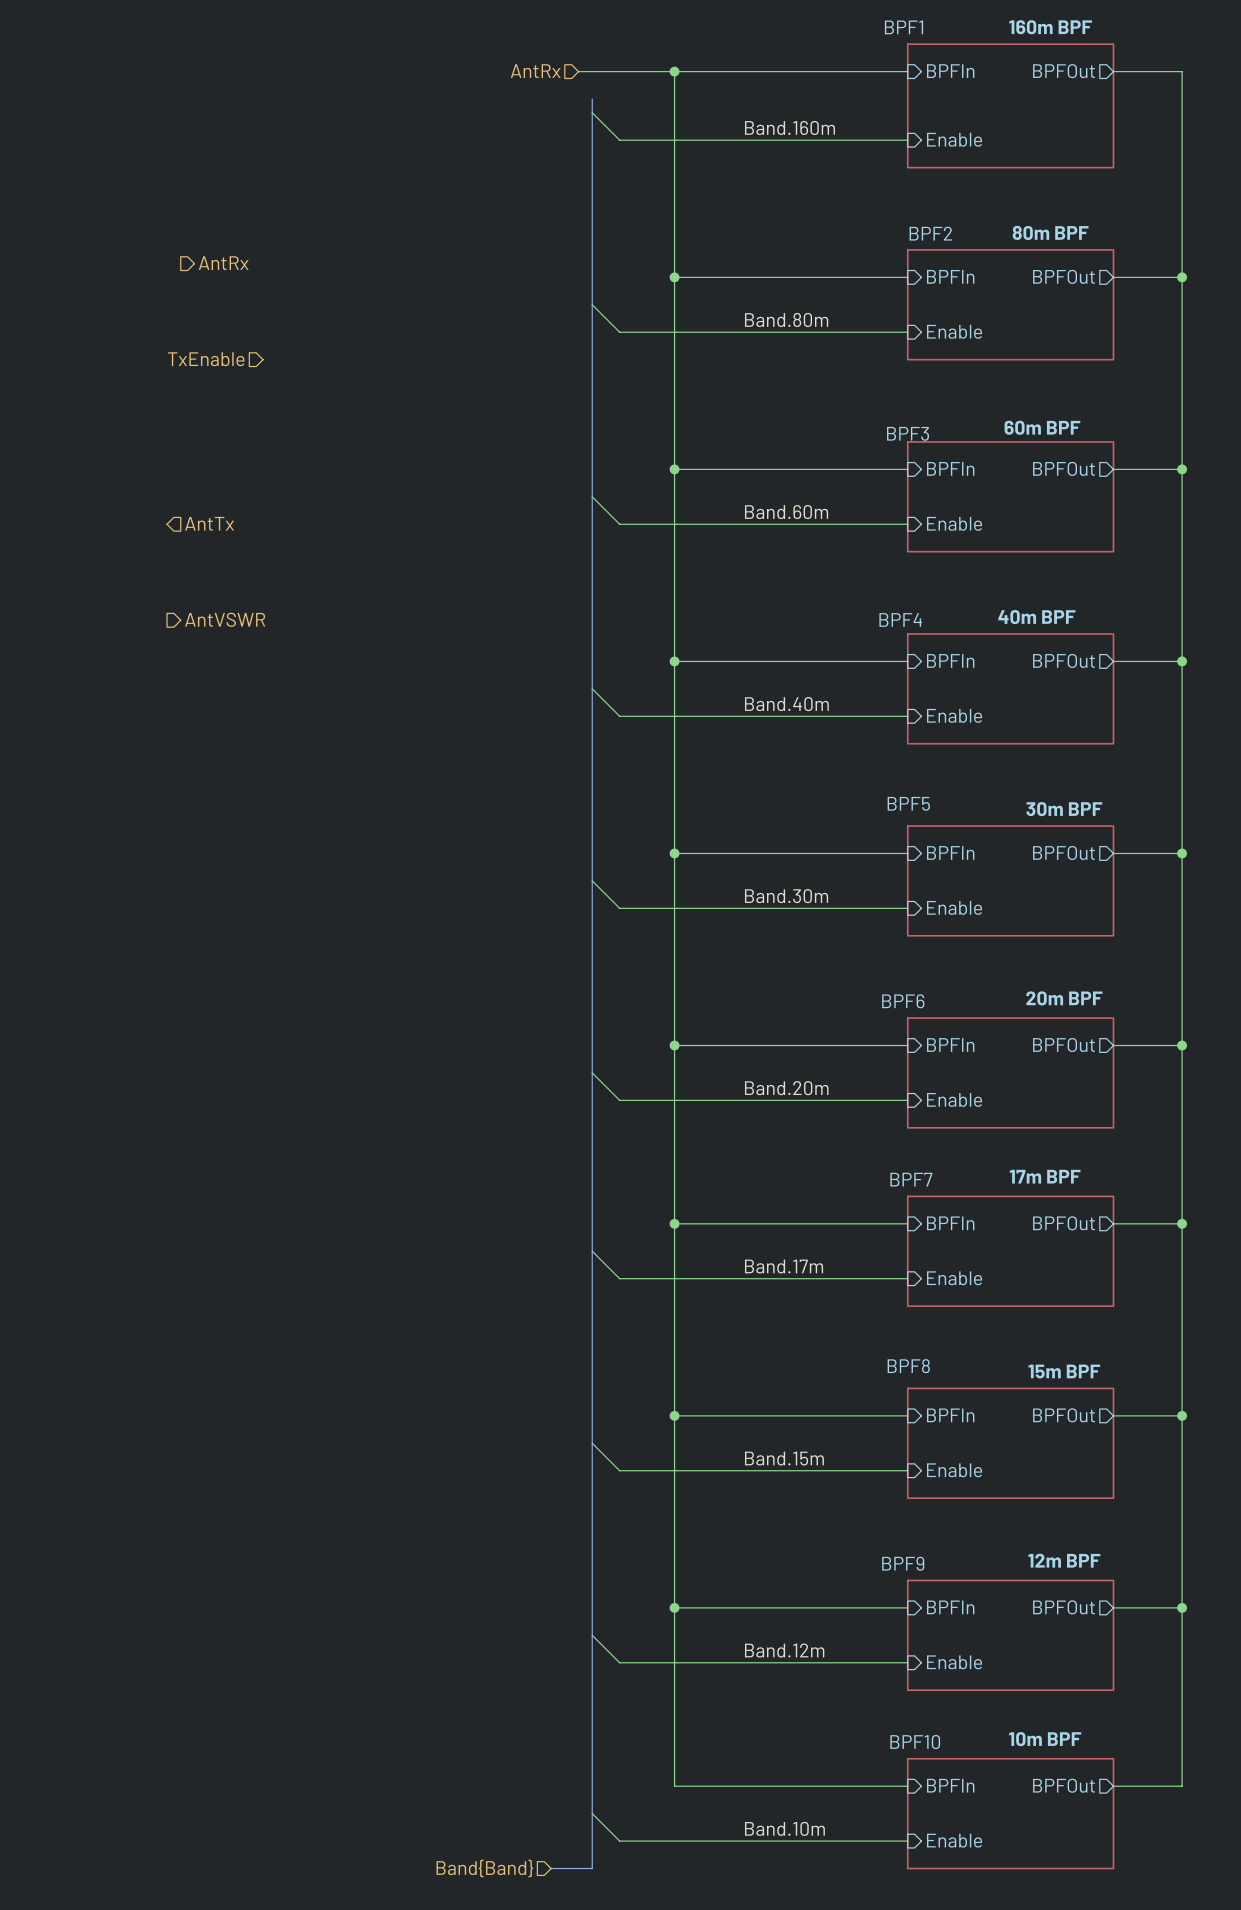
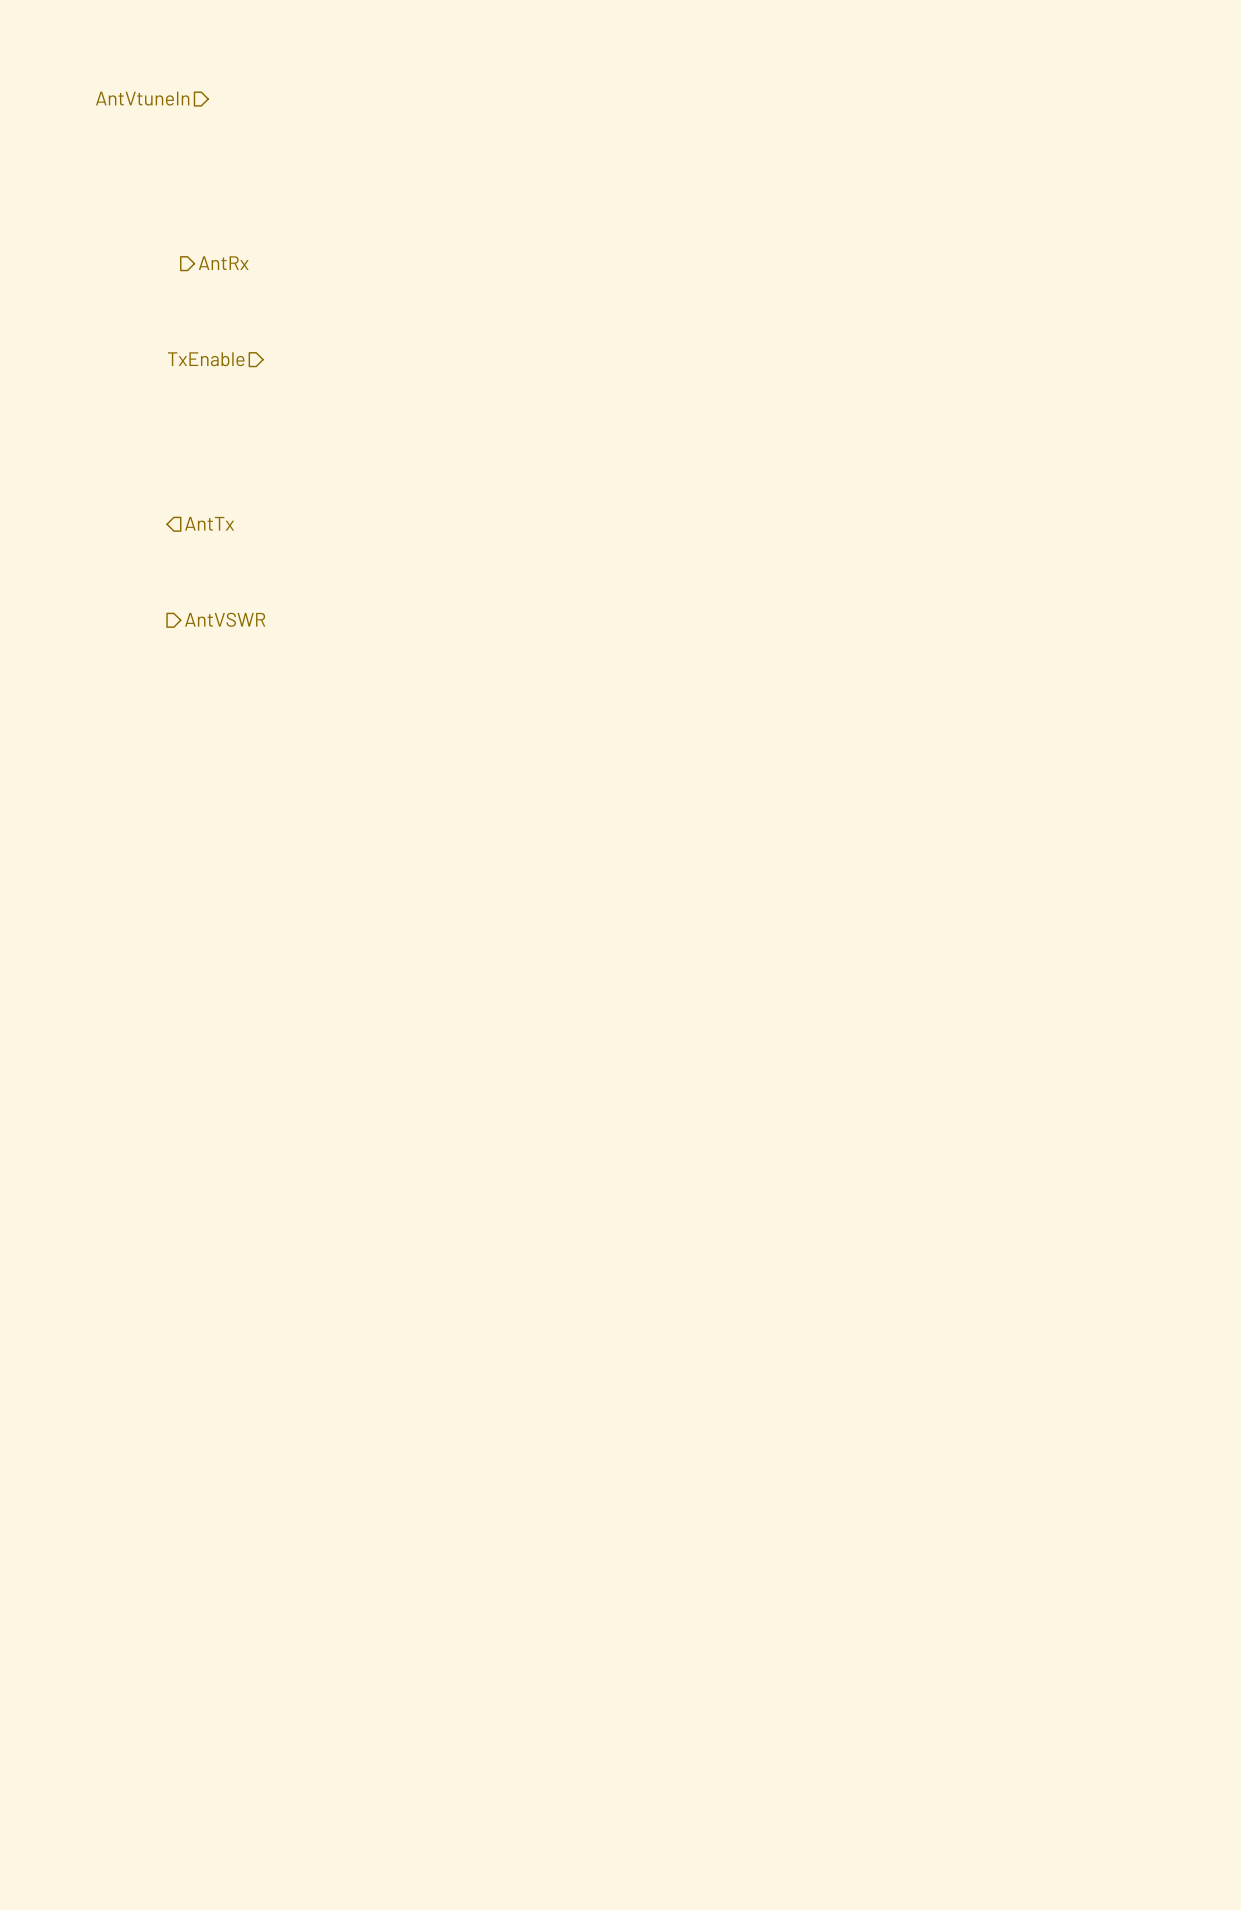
hierarchical label: AntRx (535, 71) -> none
wire: (578, 71) (907, 71) -> none
wire: (674, 71) (674, 1786) (907, 1786) -> none
junction: (674, 71) -> none
sheet pin: BPFIn (950, 71) -> none
sheet pin: BPFOut (1064, 71) -> none
wire: (1113, 71) (1182, 71) (1182, 1786) (1113, 1786) -> none
hierarchical label: none -> AntVtuneIn (142, 98)
bus: (592, 99) (592, 1868) (551, 1868) -> none
sheet BPF1: (1010, 105) -> none
wire: (592, 112) (619, 140) (907, 140) -> none
label: Band.160m (789, 127) -> none
sheet pin: Enable (954, 139) -> none
sheet pin: BPFIn (950, 276) -> none
sheet pin: BPFOut (1064, 276) -> none
wire: (674, 277) (907, 277) -> none
junction: (674, 277) -> none
wire: (1113, 277) (1182, 277) -> none
junction: (1182, 277) -> none
wire: (592, 304) (619, 332) (907, 332) -> none
sheet BPF2: (1010, 304) -> none
label: Band.80m (786, 319) -> none
sheet pin: Enable (954, 331) -> none
sheet pin: BPFIn (950, 468) -> none
sheet pin: BPFOut (1064, 468) -> none
wire: (674, 469) (907, 469) -> none
junction: (674, 469) -> none
wire: (1113, 469) (1182, 469) -> none
junction: (1182, 469) -> none
wire: (592, 496) (619, 524) (907, 524) -> none
sheet BPF3: (1010, 496) -> none
label: Band.60m (786, 512) -> none
sheet pin: Enable (954, 523) -> none
sheet pin: BPFIn (950, 660) -> none
sheet pin: BPFOut (1064, 660) -> none
wire: (674, 661) (907, 661) -> none
junction: (674, 661) -> none
wire: (1113, 661) (1182, 661) -> none
junction: (1182, 661) -> none
wire: (592, 688) (619, 716) (907, 716) -> none
sheet BPF4: (1010, 688) -> none
label: Band.40m (786, 704) -> none
sheet pin: Enable (954, 715) -> none
sheet pin: BPFIn (950, 852) -> none
sheet pin: BPFOut (1064, 852) -> none
wire: (674, 853) (907, 853) -> none
junction: (674, 853) -> none
wire: (1113, 853) (1182, 853) -> none
junction: (1182, 853) -> none
wire: (592, 880) (619, 908) (907, 908) -> none
sheet BPF5: (1010, 880) -> none
label: Band.30m (786, 896) -> none
sheet pin: Enable (954, 907) -> none
sheet pin: BPFIn (950, 1044) -> none
wire: (674, 1045) (907, 1045) -> none
junction: (674, 1045) -> none
sheet pin: BPFOut (1064, 1045) -> none
wire: (1113, 1045) (1182, 1045) -> none
junction: (1182, 1045) -> none
wire: (592, 1072) (619, 1100) (907, 1100) -> none
sheet BPF6: (1010, 1072) -> none
label: Band.20m (786, 1088) -> none
sheet pin: Enable (954, 1099) -> none
wire: (674, 1223) (907, 1223) -> none
junction: (674, 1223) -> none
sheet pin: BPFIn (950, 1223) -> none
sheet pin: BPFOut (1064, 1223) -> none
wire: (1113, 1223) (1182, 1223) -> none
junction: (1182, 1223) -> none
wire: (592, 1251) (619, 1278) (907, 1278) -> none
sheet BPF7: (1010, 1251) -> none
label: Band.17m (784, 1266) -> none
sheet pin: Enable (954, 1278) -> none
wire: (674, 1415) (907, 1415) -> none
junction: (674, 1415) -> none
sheet pin: BPFIn (950, 1415) -> none
sheet pin: BPFOut (1064, 1415) -> none
wire: (1113, 1415) (1182, 1415) -> none
junction: (1182, 1415) -> none
wire: (592, 1443) (619, 1470) (907, 1470) -> none
sheet BPF8: (1010, 1443) -> none
label: Band.15m (784, 1458) -> none
sheet pin: Enable (954, 1470) -> none
wire: (674, 1607) (907, 1607) -> none
junction: (674, 1607) -> none
sheet pin: BPFIn (950, 1607) -> none
sheet pin: BPFOut (1064, 1607) -> none
wire: (1113, 1607) (1182, 1607) -> none
junction: (1182, 1607) -> none
wire: (592, 1635) (619, 1662) (907, 1662) -> none
sheet BPF9: (1010, 1635) -> none
label: Band.12m (784, 1650) -> none
sheet pin: Enable (954, 1662) -> none
sheet pin: BPFIn (950, 1785) -> none
sheet pin: BPFOut (1064, 1785) -> none
wire: (592, 1813) (619, 1841) (907, 1841) -> none
sheet BPF10: (1010, 1813) -> none
label: Band.10m (784, 1828) -> none
sheet pin: Enable (954, 1840) -> none
hierarchical label: Band{Band} (484, 1868) -> none

